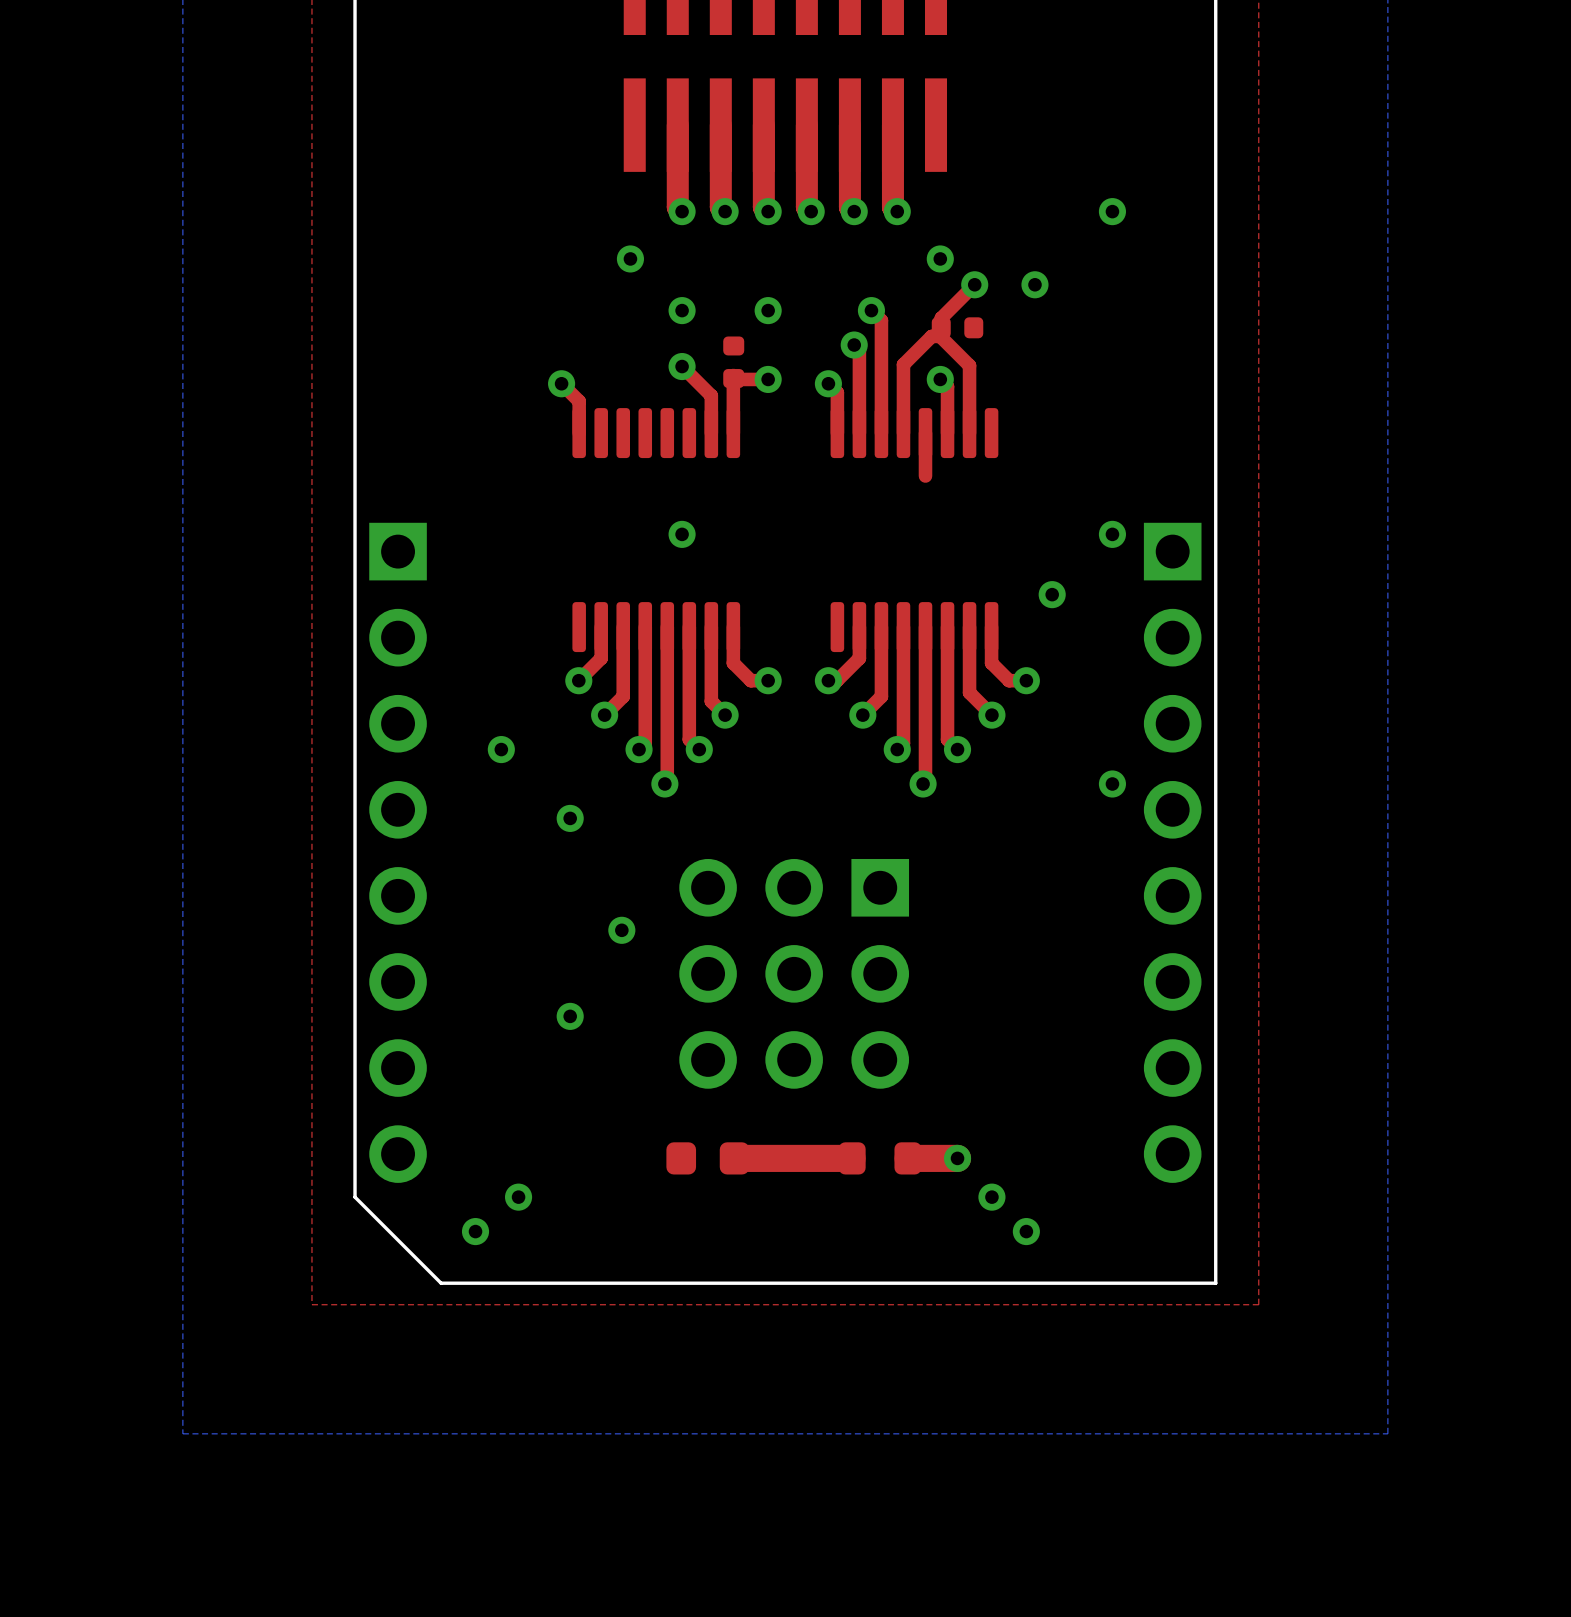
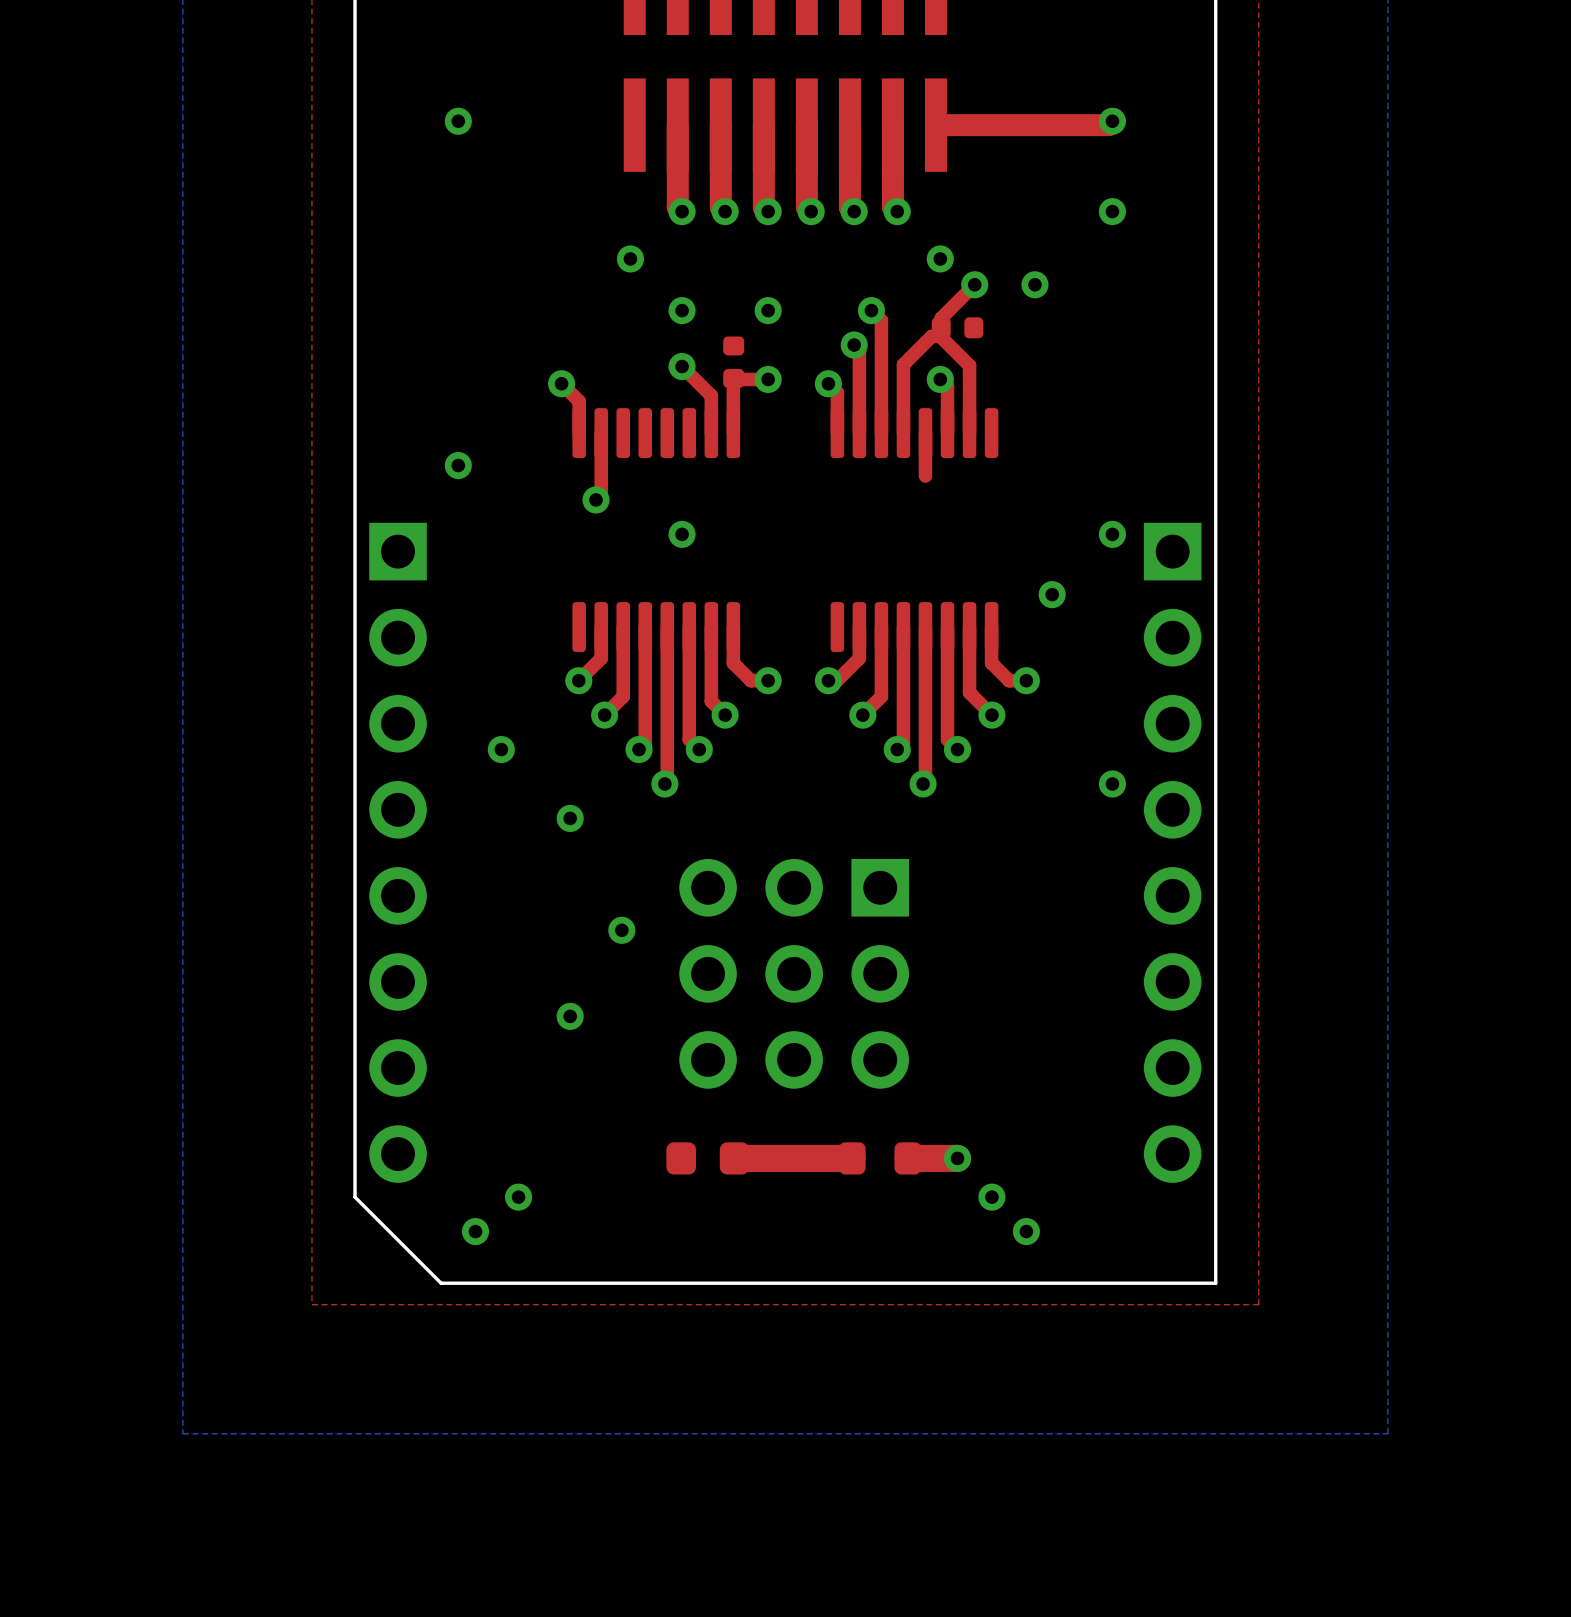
via: none -> (458, 121)
top track: none -> (1112, 121) (1108, 125) (936, 125)
via: none -> (1112, 121)
top track: none -> (601, 433) (601, 494) (596, 499)
via: none -> (458, 465)
via: none -> (596, 499)

